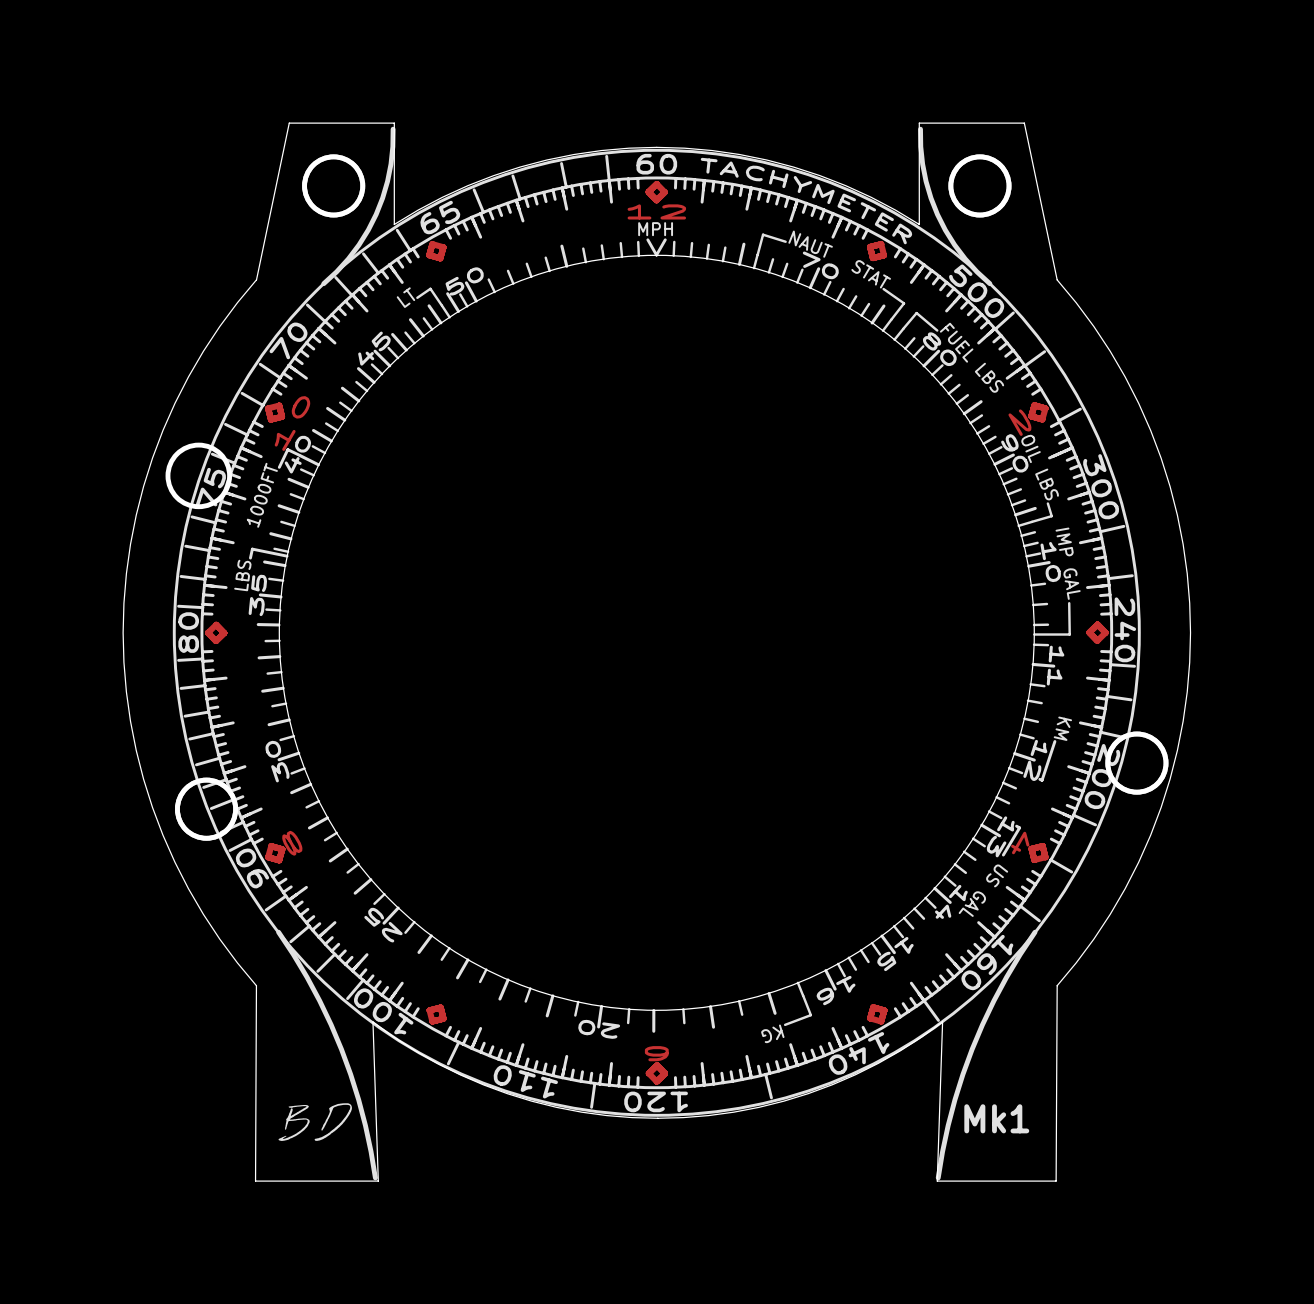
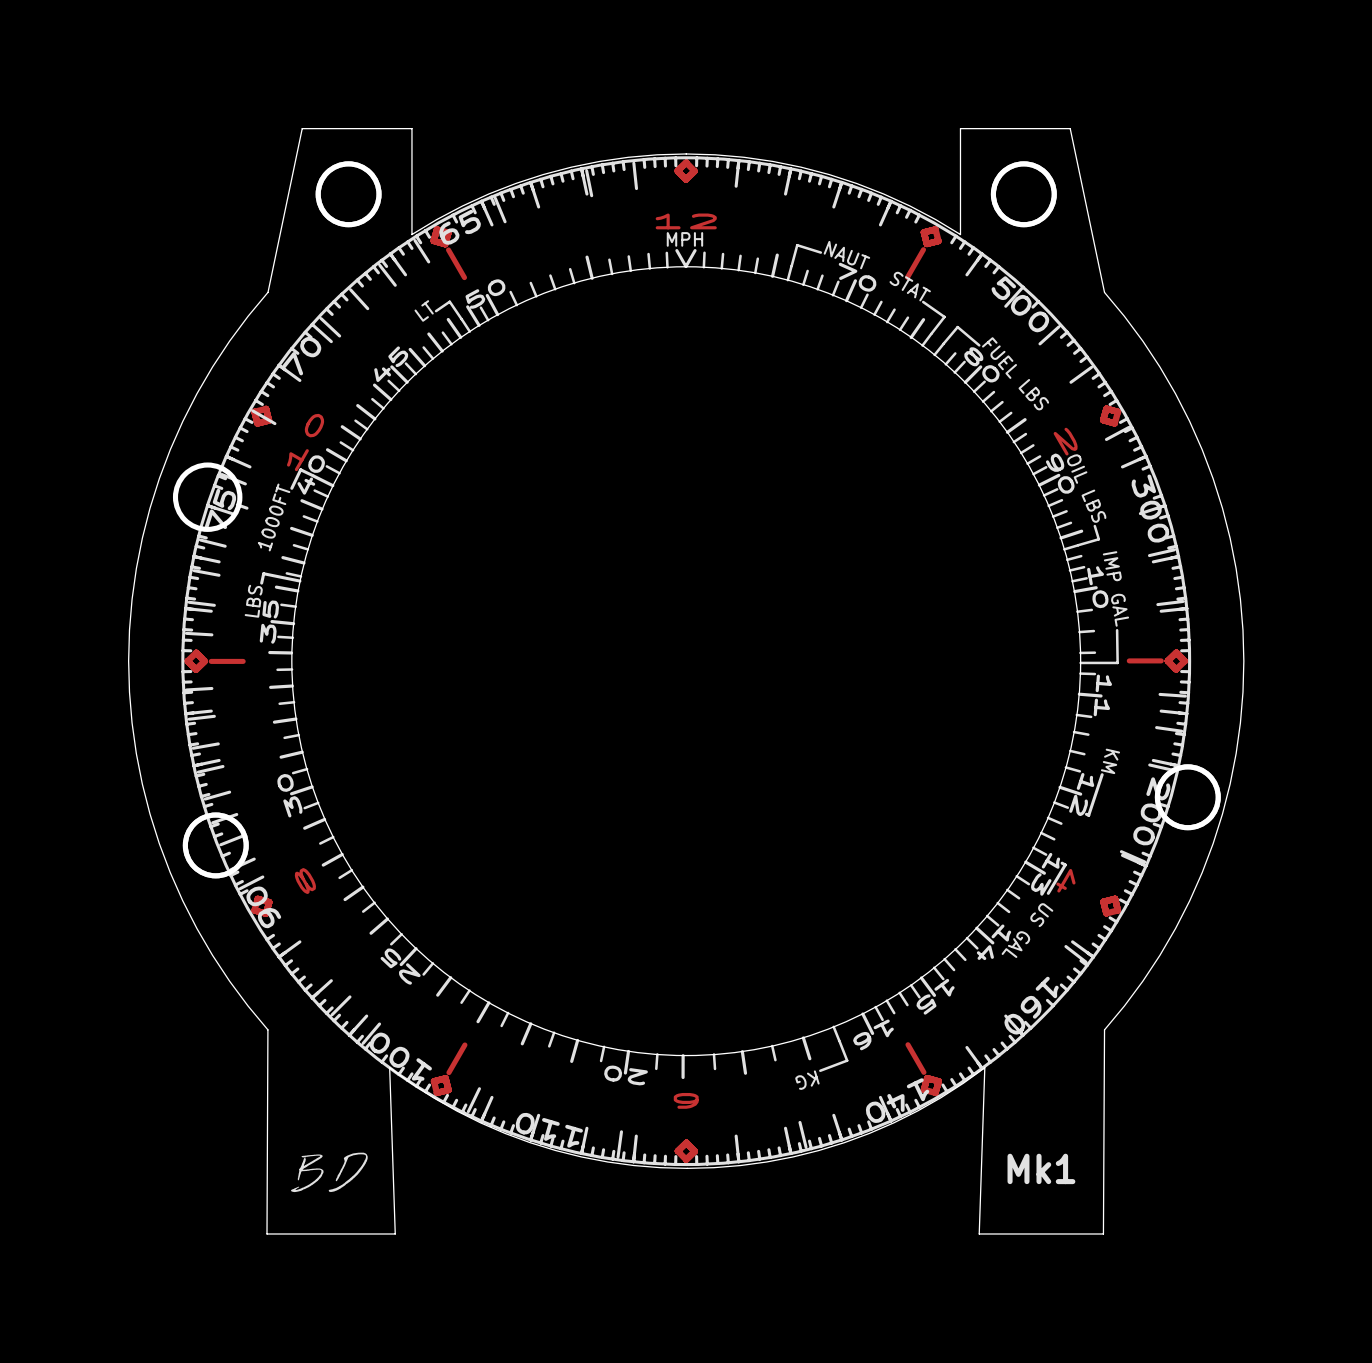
line: (393, 129) (392, 146) (387, 181) (376, 214) (359, 244) (348, 258) (323, 283) -> none
line: (920, 129) (922, 164) (926, 181) (937, 214) (945, 230) (965, 258) (989, 283) -> none
drawing: [172, 148, 1141, 1117] -> none
drawing: none -> [181, 156, 1192, 1167]
line: none -> (654, 158) (655, 166)
line: none -> (665, 158) (665, 166)
line: none -> (675, 157) (675, 165)
line: none -> (696, 157) (696, 165)
line: none -> (707, 158) (706, 166)
line: none -> (717, 158) (717, 166)
line: none -> (644, 159) (644, 167)
line: none -> (728, 159) (727, 167)
line: none -> (738, 160) (736, 186)
line: none -> (623, 161) (624, 169)
line: none -> (749, 161) (748, 169)
line: none -> (612, 163) (613, 170)
line: none -> (759, 163) (758, 170)
line: none -> (602, 164) (603, 172)
line: none -> (770, 164) (768, 172)
line: none -> (591, 166) (593, 174)
line: none -> (780, 166) (779, 174)
line: none -> (581, 168) (586, 194)
line: none -> (790, 168) (785, 194)
line: none -> (571, 171) (573, 178)
line: none -> (801, 171) (799, 178)
text: 60 (656, 164) -> none
text: T (709, 165) -> none
line: none -> (561, 173) (562, 181)
line: none -> (811, 173) (809, 181)
line: none -> (550, 176) (552, 183)
line: none -> (821, 176) (819, 183)
text: A (729, 169) -> none
line: none -> (540, 179) (543, 186)
line: none -> (831, 179) (829, 186)
text: C (755, 173) -> none
line: none -> (530, 182) (538, 207)
line: none -> (841, 182) (833, 207)
line: none -> (520, 185) (523, 193)
line: none -> (851, 185) (849, 193)
line: (628, 178) (628, 188) -> none
line: (637, 178) (638, 188) -> none
line: (675, 178) (675, 188) -> none
line: (685, 178) (684, 188) -> none
text: H (778, 178) -> none
line: (618, 179) (619, 189) -> none
line: (694, 179) (694, 189) -> none
line: none -> (510, 189) (513, 196)
line: (599, 181) (601, 191) -> none
line: (713, 181) (712, 191) -> none
line: none -> (861, 189) (858, 196)
line: (590, 182) (591, 192) -> none
line: (723, 182) (721, 192) -> none
line: none -> (500, 193) (503, 200)
line: (580, 184) (582, 193) -> none
top track: (656, 184) (664, 192) (656, 200) (648, 192) (656, 184) -> (686, 162) (694, 171) (686, 179) (677, 170) (686, 162)
line: (732, 184) (731, 193) -> none
text: Y (802, 184) -> none
line: none -> (871, 193) (868, 200)
line: (571, 186) (573, 195) -> none
line: (742, 186) (740, 195) -> none
text: | (516, 187) -> none
line: none -> (491, 197) (494, 204)
line: none -> (881, 197) (878, 204)
line: (552, 189) (555, 199) -> none
line: (760, 189) (758, 199) -> none
line: (610, 190) (609, 180) (611, 202) -> none
line: (703, 190) (704, 180) (702, 202) -> none
line: none -> (481, 201) (492, 224)
line: (543, 192) (546, 201) -> none
line: (769, 192) (767, 201) -> none
line: none -> (890, 201) (880, 224)
line: (534, 194) (537, 204) -> none
line: (779, 194) (776, 204) -> none
text: M (823, 194) -> none
line: none -> (471, 205) (475, 212)
line: none -> (900, 205) (897, 212)
line: (525, 197) (528, 206) -> none
line: (564, 197) (562, 187) (566, 209) -> none
line: (749, 197) (751, 187) (746, 209) -> none
line: (788, 197) (785, 206) -> none
line: none -> (910, 210) (906, 217)
text: E (846, 202) -> none
line: (507, 203) (510, 212) -> none
line: (806, 203) (803, 212) -> none
line: none -> (453, 215) (456, 222)
line: none -> (919, 215) (915, 222)
line: (498, 206) (501, 215) -> none
line: (815, 206) (812, 215) -> none
line: (489, 209) (492, 218) -> none
line: (519, 209) (516, 200) (522, 220) -> none
line: (794, 209) (797, 200) (790, 220) -> none
line: (824, 209) (820, 218) -> none
text: T (868, 210) -> none
line: (480, 213) (484, 222) -> none
line: (833, 213) (829, 222) -> none
line: none -> (425, 230) (429, 237)
line: (463, 221) (467, 230) -> none
line: (850, 221) (846, 230) -> none
text: E (884, 221) -> none
line: (454, 225) (458, 234) -> none
line: (859, 225) (854, 234) -> none
line: none -> (416, 236) (420, 242)
line: (475, 226) (471, 217) (480, 237) -> none
line: (837, 226) (841, 217) (832, 237) -> none
line: none -> (955, 236) (951, 242)
line: (446, 229) (450, 238) -> none
line: (867, 229) (863, 238) -> none
line: none -> (407, 241) (412, 248)
line: none -> (964, 241) (960, 248)
text: R (902, 233) -> none
line: none -> (398, 247) (403, 254)
line: none -> (973, 247) (969, 254)
top track: none -> (923, 249) (907, 277)
top track: none -> (448, 249) (464, 277)
line: none -> (390, 253) (405, 274)
line: none -> (982, 253) (966, 274)
top track: (432, 244) (429, 255) (440, 258) (443, 247) (432, 244) -> (436, 229) (433, 240) (445, 244) (448, 232) (436, 229)
top track: (881, 244) (870, 246) (872, 258) (884, 255) (881, 244) -> (935, 229) (923, 232) (926, 243) (938, 241) (935, 229)
line: (413, 248) (418, 256) -> none
line: (900, 248) (895, 256) -> none
line: none -> (381, 260) (386, 266)
line: none -> (990, 260) (985, 266)
line: (405, 253) (410, 262) -> none
line: (908, 253) (903, 262) -> none
line: none -> (373, 266) (378, 272)
line: none -> (998, 266) (994, 272)
line: (397, 259) (402, 267) -> none
line: (916, 259) (910, 267) -> none
line: none -> (365, 273) (370, 279)
line: none -> (357, 280) (362, 286)
line: (381, 270) (387, 278) -> none
line: (931, 270) (925, 278) -> none
line: (395, 272) (389, 264) (402, 282) -> none
line: (918, 272) (924, 264) (911, 282) -> none
line: none -> (1023, 287) (1005, 306)
line: (374, 276) (380, 283) -> none
line: (939, 276) (933, 283) -> none
line: none -> (341, 294) (347, 299)
line: (366, 282) (373, 289) -> none
line: (946, 282) (940, 289) -> none
line: none -> (334, 301) (339, 307)
line: (359, 288) (365, 295) -> none
line: (954, 288) (947, 295) -> none
line: none -> (1038, 301) (1032, 307)
line: none -> (326, 308) (332, 314)
line: (345, 301) (352, 308) -> none
line: (358, 301) (352, 294) (367, 311) -> none
line: (968, 301) (961, 308) -> none
line: (954, 302) (961, 294) (946, 311) -> none
line: (338, 307) (345, 314) -> none
line: (975, 307) (968, 314) -> none
line: none -> (312, 324) (331, 341)
line: (331, 314) (338, 321) -> none
line: (981, 314) (974, 321) -> none
line: none -> (305, 332) (311, 337)
line: none -> (1067, 332) (1061, 337)
line: (325, 321) (332, 328) -> none
line: (988, 321) (981, 328) -> none
line: none -> (1074, 340) (1068, 345)
line: none -> (291, 348) (297, 353)
line: none -> (1080, 348) (1074, 353)
line: (326, 334) (318, 328) (335, 343) -> none
line: (987, 334) (994, 328) (978, 343) -> none
line: (312, 335) (319, 341) -> none
line: (1001, 335) (993, 341) -> none
line: none -> (1087, 356) (1080, 361)
line: (306, 342) (313, 349) -> none
line: (1007, 342) (999, 349) -> none
line: none -> (278, 365) (299, 380)
line: (300, 350) (307, 356) -> none
line: (1013, 350) (1005, 356) -> none
line: none -> (272, 373) (279, 378)
line: (294, 357) (302, 363) -> none
line: (1019, 357) (1011, 363) -> none
line: none -> (1099, 373) (1093, 378)
line: none -> (266, 382) (273, 386)
line: none -> (1105, 382) (1098, 386)
text: | (270, 371) -> none
line: (296, 371) (288, 365) (306, 378) -> none
line: (1016, 371) (1024, 365) (1007, 378) -> none
line: (283, 373) (291, 378) -> none
line: (1030, 373) (1022, 378) -> none
line: none -> (261, 391) (267, 395)
line: none -> (1111, 391) (1104, 395)
line: (277, 381) (286, 386) -> none
line: (1035, 381) (1027, 386) -> none
line: none -> (255, 400) (262, 404)
line: none -> (1116, 400) (1110, 404)
line: (272, 389) (280, 394) -> none
line: (1040, 389) (1032, 394) -> none
line: none -> (245, 418) (251, 422)
line: none -> (1127, 418) (1120, 422)
top track: (279, 405) (282, 416) (270, 419) (268, 408) (279, 405) -> (266, 408) (269, 420) (257, 423) (254, 411) (266, 408)
top track: (1034, 405) (1031, 416) (1042, 419) (1045, 408) (1034, 405) -> (1106, 408) (1103, 420) (1114, 423) (1118, 411) (1106, 408)
line: none -> (240, 427) (247, 431)
line: none -> (1132, 427) (1125, 431)
line: none -> (235, 437) (242, 440)
line: none -> (1137, 437) (1130, 440)
line: (253, 422) (262, 426) -> none
line: (1059, 422) (1051, 426) -> none
line: none -> (230, 446) (237, 450)
line: none -> (1141, 446) (1134, 450)
text: | (236, 429) -> none
line: (249, 430) (258, 434) -> none
line: (1064, 430) (1055, 434) -> none
line: none -> (226, 456) (249, 466)
line: none -> (1146, 456) (1122, 466)
line: (245, 439) (254, 443) -> none
line: (1068, 439) (1059, 443) -> none
line: none -> (1150, 466) (1143, 469)
line: (250, 451) (241, 447) (261, 456) -> none
line: (1063, 451) (1072, 447) (1049, 457) -> none
line: none -> (218, 475) (225, 478)
line: (237, 456) (246, 460) -> none
line: (1076, 456) (1067, 460) -> none
line: none -> (214, 485) (221, 488)
line: (233, 465) (242, 468) -> none
line: (1079, 465) (1070, 468) -> none
line: (230, 474) (239, 477) -> none
line: (1083, 474) (1074, 477) -> none
line: none -> (1161, 495) (1154, 498)
line: none -> (207, 505) (232, 513)
line: (1086, 483) (1077, 486) -> none
line: none -> (1164, 505) (1140, 513)
line: none -> (1168, 515) (1160, 517)
line: (233, 495) (224, 492) (244, 499) -> none
line: (1080, 495) (1089, 492) (1068, 499) -> none
line: (221, 501) (230, 504) -> none
line: (1092, 501) (1082, 504) -> none
line: (218, 510) (228, 513) -> none
line: (1094, 510) (1085, 513) -> none
line: none -> (198, 535) (206, 537)
line: none -> (1173, 535) (1166, 537)
line: (216, 519) (225, 522) -> none
line: (1097, 519) (1088, 522) -> none
line: none -> (196, 546) (203, 548)
line: none -> (1176, 546) (1168, 548)
line: (213, 528) (223, 531) -> none
line: (1099, 528) (1090, 531) -> none
line: none -> (193, 556) (219, 561)
line: none -> (1178, 556) (1153, 561)
line: (221, 540) (211, 538) (233, 542) -> none
line: (1092, 540) (1101, 538) (1080, 542) -> none
line: none -> (191, 566) (199, 568)
line: none -> (1180, 566) (1172, 568)
line: (209, 547) (219, 549) -> none
line: (1103, 547) (1094, 549) -> none
line: none -> (189, 577) (197, 578)
line: none -> (1182, 577) (1174, 578)
line: (208, 556) (217, 558) -> none
line: (1105, 556) (1095, 558) -> none
line: none -> (188, 587) (196, 588)
line: none -> (1184, 587) (1176, 588)
line: (206, 566) (216, 567) -> none
line: (1106, 566) (1097, 567) -> none
line: none -> (186, 598) (194, 599)
line: none -> (1185, 598) (1177, 599)
line: (205, 575) (215, 577) -> none
line: (1108, 575) (1098, 577) -> none
line: none -> (185, 608) (211, 611)
line: none -> (1186, 608) (1161, 611)
line: (214, 586) (204, 585) (226, 587) -> none
line: (1099, 586) (1109, 585) (1087, 587) -> none
line: none -> (184, 619) (192, 619)
line: none -> (1187, 619) (1180, 619)
line: (203, 594) (213, 595) -> none
line: (1110, 594) (1100, 595) -> none
line: none -> (183, 629) (191, 630)
line: none -> (1188, 629) (1180, 630)
line: (202, 604) (212, 604) -> none
line: (1110, 604) (1101, 604) -> none
line: none -> (183, 640) (191, 640)
line: none -> (1189, 640) (1181, 640)
line: (202, 613) (212, 614) -> none
line: (1111, 613) (1101, 614) -> none
line: none -> (182, 650) (190, 650)
line: none -> (1189, 650) (1181, 650)
top track: (216, 624) (208, 632) (216, 641) (224, 633) (216, 624) -> (196, 652) (187, 661) (196, 669) (204, 661) (196, 652)
top track: (1097, 624) (1105, 632) (1097, 640) (1089, 632) (1097, 624) -> (1176, 652) (1184, 661) (1176, 669) (1167, 660) (1176, 652)
text: 240 (1125, 629) -> none
text: 80 (188, 632) -> none
top track: none -> (1129, 660) (1161, 660)
top track: none -> (211, 661) (243, 661)
line: none -> (190, 671) (182, 671)
line: none -> (1181, 671) (1189, 671)
line: (212, 651) (202, 651) -> none
line: (1101, 651) (1111, 651) -> none
line: none -> (191, 681) (183, 682)
line: none -> (1181, 681) (1189, 682)
line: (212, 660) (202, 661) -> none
line: (1101, 660) (1110, 661) -> none
line: none -> (191, 692) (183, 692)
line: none -> (1180, 692) (1188, 692)
line: (213, 670) (203, 670) -> none
line: (1100, 670) (1110, 670) -> none
line: none -> (192, 702) (184, 703)
line: none -> (1180, 702) (1187, 703)
line: (226, 678) (204, 680) (214, 679) -> none
line: (1087, 678) (1109, 680) (1099, 679) -> none
line: none -> (211, 711) (185, 713)
line: none -> (1161, 711) (1186, 713)
line: (215, 688) (205, 689) -> none
line: (1098, 688) (1108, 689) -> none
line: none -> (194, 723) (186, 724)
line: none -> (1177, 723) (1185, 724)
line: (216, 697) (206, 699) -> none
line: (1097, 697) (1106, 699) -> none
line: none -> (196, 733) (188, 734)
line: none -> (1176, 733) (1184, 734)
line: (217, 707) (208, 708) -> none
line: (1095, 707) (1105, 708) -> none
line: none -> (197, 743) (189, 745)
line: none -> (1174, 743) (1182, 745)
line: (219, 716) (209, 718) -> none
line: (1094, 716) (1103, 718) -> none
line: none -> (199, 754) (191, 755)
line: none -> (1172, 754) (1180, 755)
line: (233, 722) (211, 727) (221, 725) -> none
line: (1080, 722) (1101, 727) (1092, 725) -> none
line: none -> (219, 760) (193, 765)
line: none -> (1153, 760) (1178, 765)
line: (223, 734) (213, 736) -> none
line: (1090, 734) (1099, 736) -> none
line: none -> (203, 774) (196, 776)
line: (225, 743) (216, 745) -> none
line: (1087, 743) (1097, 745) -> none
line: none -> (206, 784) (198, 786)
line: (228, 752) (218, 755) -> none
line: (1085, 752) (1094, 755) -> none
line: none -> (208, 794) (201, 796)
line: (230, 761) (221, 764) -> none
line: (1082, 761) (1092, 764) -> none
line: (244, 766) (224, 773) (233, 770) -> none
line: (1068, 766) (1089, 773) (1080, 770) -> none
line: none -> (211, 804) (204, 806)
line: none -> (1160, 804) (1168, 806)
line: (236, 779) (227, 782) -> none
line: (1077, 779) (1086, 782) -> none
line: (239, 787) (230, 791) -> none
line: none -> (218, 824) (210, 826)
line: (1074, 788) (1083, 791) -> none
line: none -> (1154, 824) (1161, 826)
line: (242, 796) (233, 800) -> none
line: (1070, 796) (1079, 800) -> none
line: none -> (221, 833) (214, 836)
line: (246, 805) (237, 809) -> none
line: (1067, 805) (1076, 809) -> none
line: (261, 808) (241, 817) (250, 813) -> none
line: (1052, 808) (1072, 817) (1063, 813) -> none
line: none -> (229, 853) (222, 856)
line: none -> (1143, 853) (1150, 856)
line: none -> (1122, 855) (1146, 865)
line: (253, 822) (245, 826) -> none
line: (1059, 822) (1068, 826) -> none
line: (258, 830) (249, 835) -> none
line: (1055, 830) (1064, 835) -> none
line: none -> (237, 872) (230, 875)
line: none -> (1134, 872) (1141, 875)
line: (262, 839) (253, 843) -> none
line: (1051, 839) (1059, 843) -> none
line: none -> (242, 881) (235, 884)
line: none -> (1130, 881) (1137, 884)
top track: (271, 846) (282, 849) (279, 860) (268, 857) (271, 846) -> (257, 898) (269, 902) (265, 913) (254, 910) (257, 898)
top track: (1042, 846) (1045, 857) (1034, 860) (1031, 848) (1042, 846) -> (1115, 898) (1117, 910) (1106, 913) (1103, 901) (1115, 898)
line: none -> (247, 890) (240, 894)
line: none -> (1125, 890) (1132, 894)
line: none -> (1120, 899) (1127, 903)
text: | (1061, 865) -> none
line: (280, 871) (272, 876) -> none
line: (1032, 871) (1040, 876) -> none
line: none -> (1110, 917) (1116, 921)
line: (286, 879) (277, 884) -> none
line: (1027, 879) (1035, 884) -> none
line: (291, 886) (283, 892) -> none
line: (1022, 886) (1030, 892) -> none
line: none -> (1104, 926) (1111, 930)
line: (306, 887) (288, 900) (296, 894) -> none
line: (1007, 887) (1024, 900) (1016, 894) -> none
line: none -> (273, 935) (266, 939)
line: none -> (1098, 935) (1105, 939)
line: none -> (299, 941) (278, 957)
line: (302, 901) (294, 907) -> none
line: (1011, 901) (1019, 907) -> none
line: none -> (1072, 941) (1093, 957)
line: none -> (279, 943) (272, 948)
text: | (276, 903) -> none
line: none -> (1093, 943) (1099, 948)
line: (307, 909) (300, 915) -> none
line: (1005, 909) (1013, 915) -> none
line: (313, 916) (306, 922) -> none
line: (999, 916) (1007, 922) -> none
line: none -> (291, 960) (285, 965)
line: none -> (1080, 960) (1087, 965)
line: (335, 922) (318, 937) (325, 930) -> none
line: (978, 922) (994, 937) (987, 930) -> none
line: (319, 923) (312, 930) -> none
line: (993, 923) (1001, 930) -> none
line: (278, 932) (319, 1000) (341, 1049) (358, 1099) (375, 1177) -> (291, 973) (297, 968)
line: (1035, 932) (1006, 977) (972, 1049) (954, 1099) (938, 1177) -> (1080, 973) (1074, 968)
text: | (300, 933) -> none
line: none -> (304, 977) (298, 982)
line: none -> (1068, 977) (1074, 982)
line: (332, 937) (325, 944) -> none
line: (981, 937) (988, 944) -> none
line: none -> (331, 980) (312, 997)
line: none -> (311, 984) (305, 990)
line: none -> (1061, 984) (1067, 990)
line: (338, 944) (331, 951) -> none
line: (974, 944) (981, 951) -> none
line: (345, 950) (338, 957) -> none
line: (968, 950) (975, 957) -> none
line: (367, 954) (352, 970) (358, 963) -> none
line: (946, 954) (961, 970) (954, 963) -> none
line: none -> (325, 1000) (319, 1005)
line: (352, 957) (345, 964) -> none
line: (961, 957) (968, 964) -> none
line: none -> (1047, 1000) (1053, 1005)
line: none -> (332, 1007) (326, 1013)
line: (365, 969) (359, 977) -> none
line: (947, 969) (954, 977) -> none
line: none -> (339, 1015) (334, 1020)
line: none -> (366, 1016) (349, 1035)
line: none -> (1005, 1016) (1023, 1035)
line: (373, 975) (366, 983) -> none
line: (940, 975) (946, 983) -> none
line: none -> (347, 1022) (341, 1028)
line: none -> (1025, 1022) (1030, 1028)
line: (380, 981) (374, 989) -> none
line: (933, 981) (939, 989) -> none
line: (402, 983) (389, 1000) (395, 992) -> none
line: (911, 983) (924, 1000) (918, 992) -> none
line: (387, 987) (381, 995) -> none
line: (925, 987) (931, 995) -> none
line: none -> (362, 1036) (357, 1042)
line: none -> (1010, 1036) (1015, 1042)
line: none -> (370, 1042) (365, 1049)
line: (402, 998) (397, 1006) -> none
line: (910, 998) (916, 1006) -> none
line: none -> (1002, 1042) (1007, 1049)
top track: none -> (907, 1044) (923, 1072)
top track: none -> (464, 1044) (448, 1072)
line: none -> (966, 1047) (982, 1068)
line: (410, 1003) (405, 1011) -> none
line: (903, 1003) (908, 1011) -> none
line: none -> (994, 1049) (998, 1055)
top track: (440, 1007) (443, 1018) (432, 1021) (429, 1010) (440, 1007) -> (445, 1078) (448, 1089) (436, 1092) (433, 1081) (445, 1078)
top track: (873, 1007) (870, 1018) (881, 1021) (884, 1010) (873, 1007) -> (927, 1078) (923, 1089) (935, 1092) (938, 1081) (927, 1078)
line: (418, 1008) (413, 1016) -> none
line: (895, 1008) (900, 1016) -> none
line: none -> (386, 1055) (381, 1062)
text: | (931, 1010) -> none
line: none -> (985, 1055) (990, 1062)
line: none -> (403, 1068) (398, 1074)
line: none -> (969, 1068) (973, 1074)
line: none -> (412, 1073) (407, 1080)
line: (450, 1027) (446, 1035) -> none
line: (863, 1027) (867, 1035) -> none
line: none -> (960, 1073) (964, 1080)
line: (480, 1028) (471, 1048) (475, 1039) -> none
line: (832, 1028) (841, 1048) (837, 1039) -> none
line: (458, 1031) (454, 1040) -> none
line: (854, 1031) (859, 1040) -> none
line: none -> (420, 1079) (416, 1086)
line: none -> (951, 1079) (955, 1086)
line: (467, 1035) (463, 1044) -> none
line: (846, 1035) (850, 1044) -> none
line: none -> (429, 1085) (425, 1091)
line: none -> (942, 1085) (946, 1091)
line: (484, 1043) (480, 1052) -> none
line: (829, 1043) (833, 1052) -> none
line: (522, 1044) (516, 1065) (519, 1056) -> none
line: (790, 1044) (797, 1065) (794, 1056) -> none
line: (492, 1046) (489, 1055) -> none
line: (820, 1046) (824, 1055) -> none
line: none -> (447, 1095) (443, 1102)
line: none -> (492, 1097) (481, 1121)
line: (501, 1050) (498, 1059) -> none
line: (811, 1050) (815, 1059) -> none
line: none -> (880, 1097) (890, 1121)
line: none -> (456, 1100) (453, 1107)
line: (510, 1053) (507, 1062) -> none
line: (803, 1053) (806, 1062) -> none
line: none -> (915, 1100) (919, 1107)
line: (566, 1056) (562, 1077) (564, 1068) -> none
line: (746, 1056) (751, 1077) (749, 1068) -> none
line: none -> (465, 1105) (462, 1112)
line: none -> (906, 1105) (910, 1112)
line: (528, 1058) (525, 1068) -> none
line: (785, 1058) (788, 1068) -> none
line: none -> (475, 1109) (471, 1116)
line: (537, 1061) (534, 1070) -> none
line: (776, 1061) (779, 1070) -> none
line: none -> (897, 1109) (900, 1116)
line: (546, 1063) (543, 1073) -> none
line: (611, 1063) (609, 1085) (610, 1075) -> none
line: (702, 1063) (704, 1085) (703, 1075) -> none
line: (767, 1064) (769, 1073) -> none
top track: (657, 1065) (648, 1073) (656, 1081) (665, 1073) (657, 1065) -> (686, 1142) (677, 1151) (686, 1159) (694, 1151) (686, 1142)
line: (555, 1066) (552, 1075) -> none
line: (758, 1066) (760, 1075) -> none
line: none -> (538, 1115) (530, 1139)
line: none -> (833, 1115) (841, 1139)
line: none -> (494, 1117) (491, 1125)
line: (573, 1070) (571, 1079) -> none
line: (740, 1070) (742, 1079) -> none
line: (582, 1071) (580, 1081) -> none
line: (731, 1071) (732, 1081) -> none
line: none -> (503, 1121) (500, 1129)
line: (591, 1073) (590, 1082) -> none
line: (721, 1073) (723, 1082) -> none
line: none -> (868, 1121) (871, 1129)
line: (600, 1074) (599, 1084) -> none
line: (712, 1074) (713, 1084) -> none
line: (619, 1076) (618, 1086) -> none
line: (694, 1076) (694, 1086) -> none
line: none -> (513, 1125) (510, 1132)
line: (628, 1077) (628, 1086) -> none
line: (638, 1077) (637, 1087) -> none
line: (675, 1077) (675, 1087) -> none
line: (684, 1077) (685, 1086) -> none
line: none -> (858, 1125) (861, 1132)
line: none -> (586, 1128) (581, 1153)
line: none -> (785, 1128) (790, 1153)
line: none -> (849, 1129) (851, 1136)
line: none -> (543, 1135) (540, 1143)
line: none -> (829, 1135) (831, 1143)
line: none -> (636, 1136) (633, 1161)
line: none -> (736, 1136) (738, 1161)
line: none -> (552, 1138) (550, 1146)
line: none -> (819, 1138) (821, 1146)
line: none -> (562, 1141) (561, 1148)
line: none -> (809, 1141) (811, 1148)
line: none -> (799, 1143) (801, 1151)
line: none -> (593, 1147) (591, 1155)
line: none -> (779, 1147) (780, 1155)
line: none -> (603, 1149) (602, 1157)
line: none -> (768, 1149) (770, 1157)
text: 120 (656, 1101) -> none
line: none -> (613, 1151) (612, 1159)
line: none -> (758, 1151) (759, 1159)
line: none -> (624, 1152) (623, 1160)
line: none -> (748, 1152) (749, 1160)
line: none -> (644, 1154) (644, 1162)
line: none -> (727, 1154) (728, 1162)
line: none -> (655, 1155) (654, 1163)
line: none -> (665, 1156) (665, 1164)
line: none -> (675, 1156) (675, 1164)
line: none -> (696, 1156) (696, 1164)
line: none -> (706, 1156) (707, 1164)
line: none -> (717, 1155) (717, 1163)

